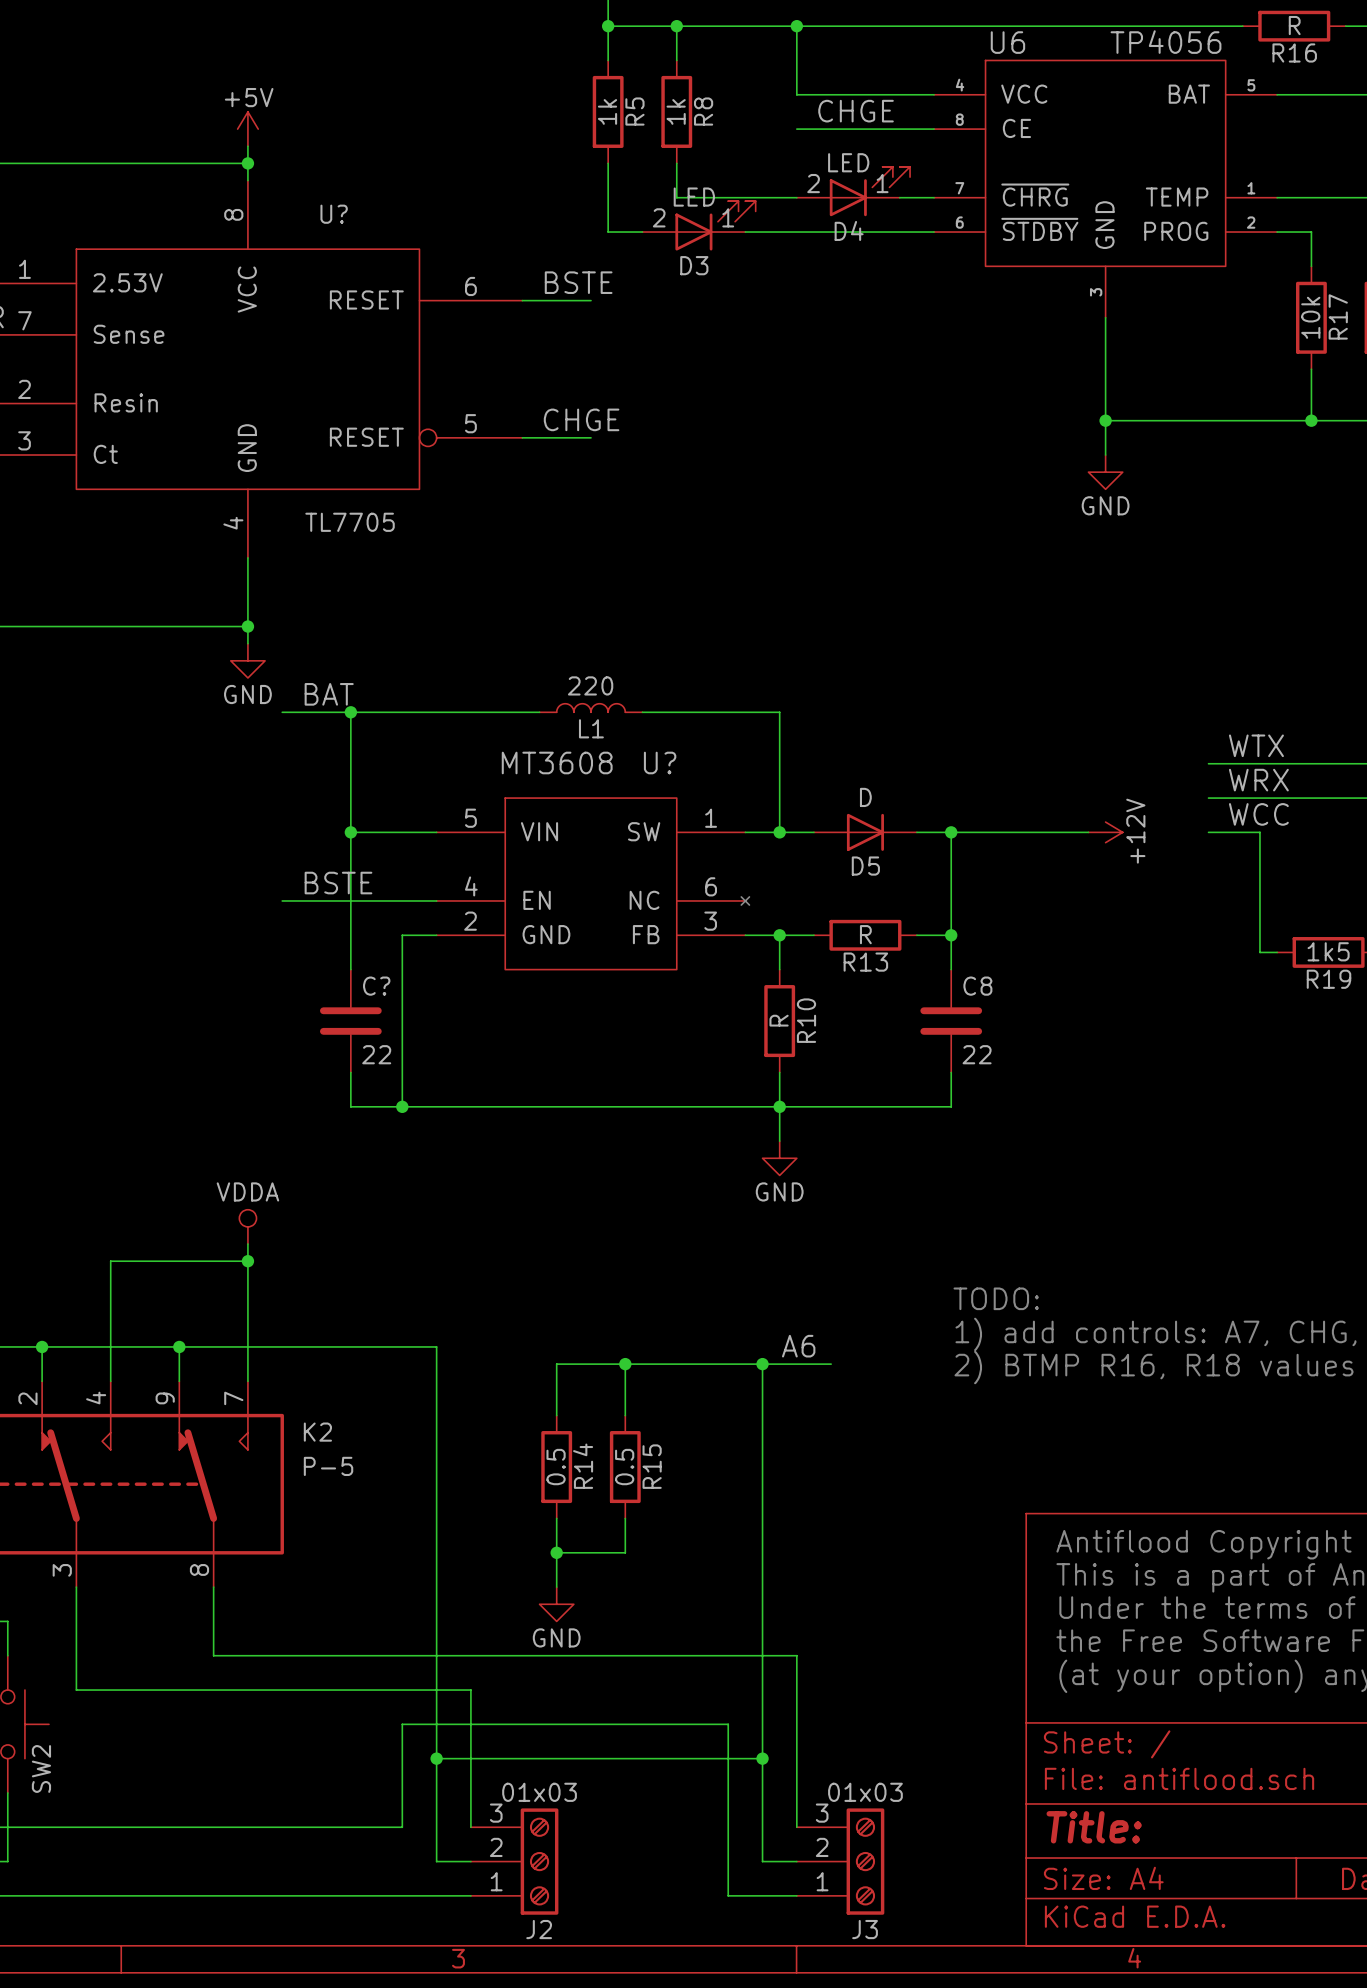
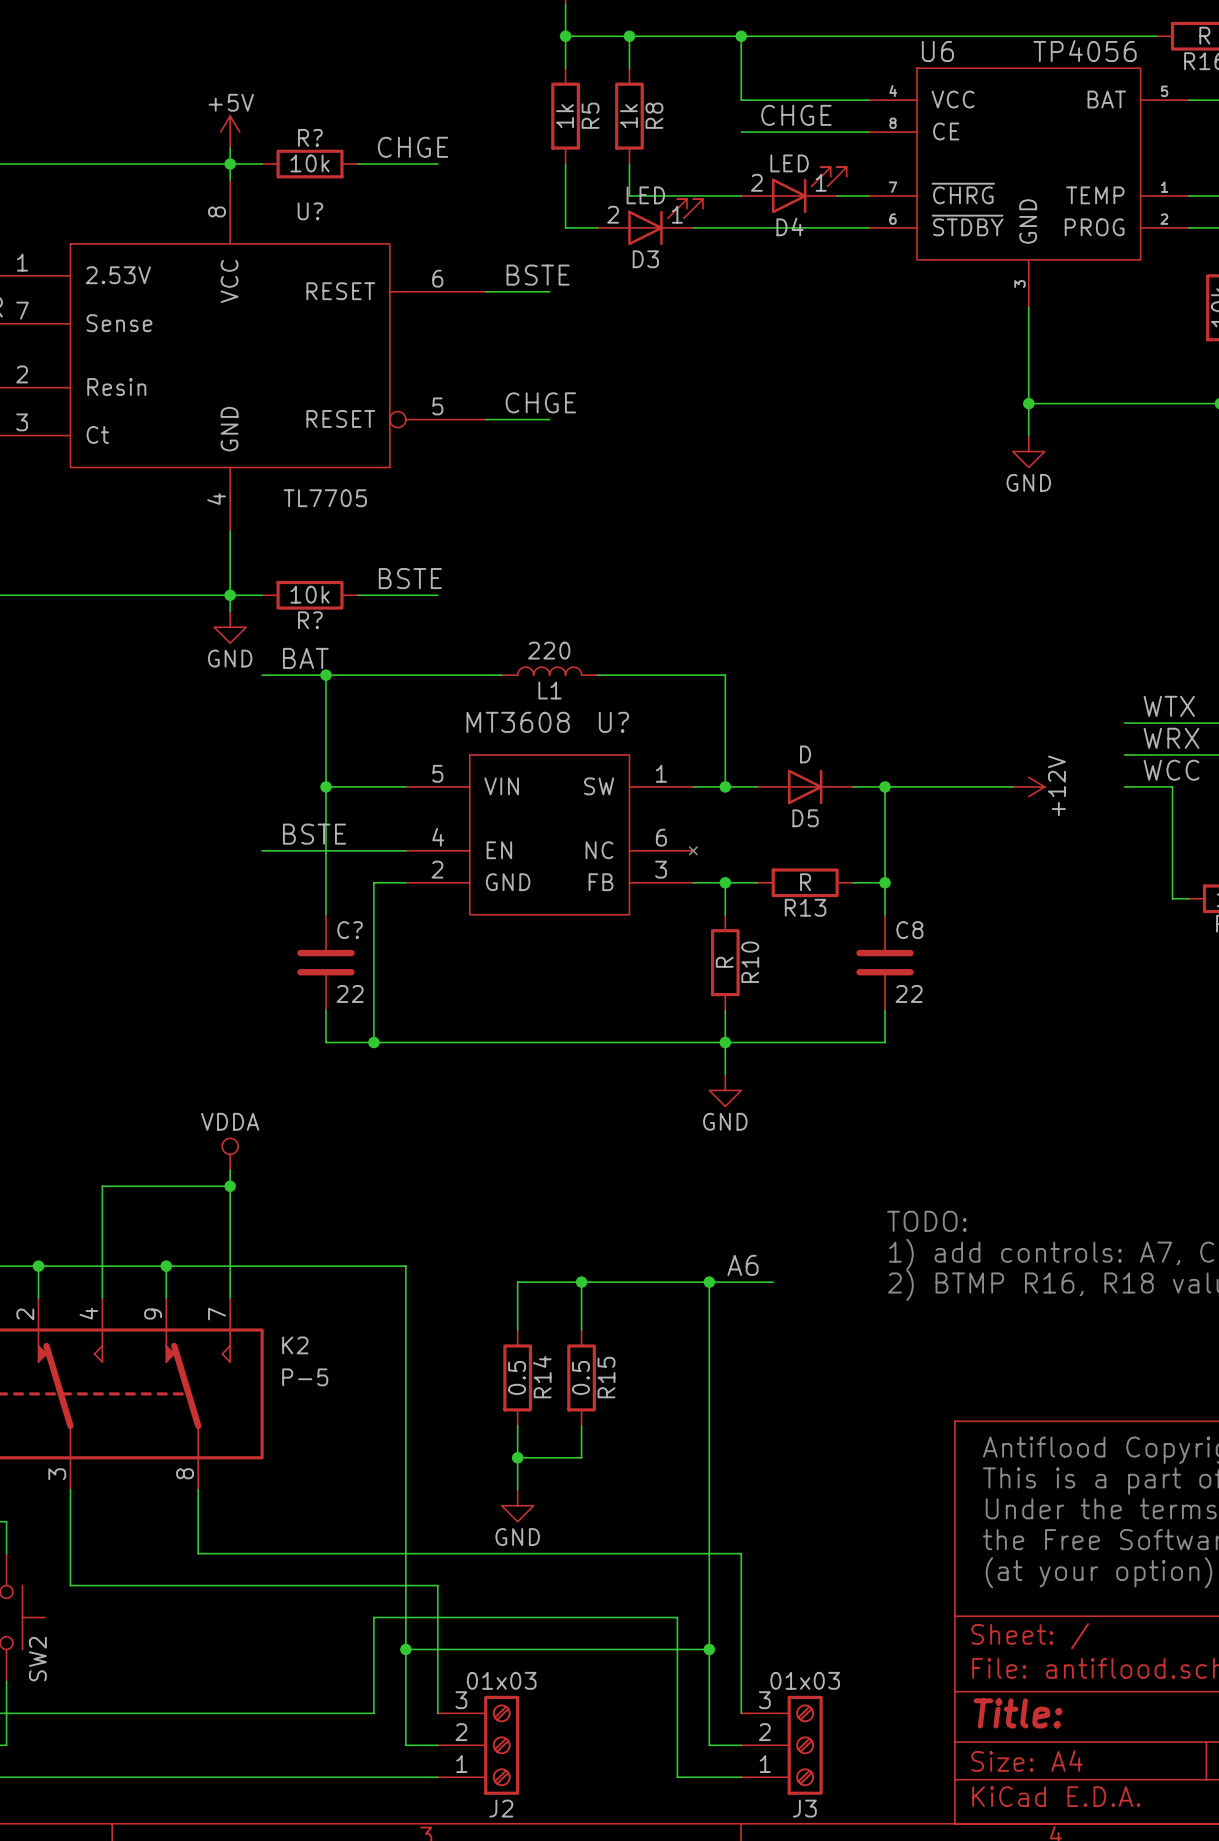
label: none -> CHGE (413, 147)
wire: none -> (230, 164) (262, 164)
R?: none -> 10k (310, 164)
wire: none -> (357, 164) (437, 164)
label: none -> BSTE (410, 578)
wire: none -> (230, 595) (262, 595)
R?: none -> 10k (310, 595)
wire: none -> (357, 595) (437, 595)

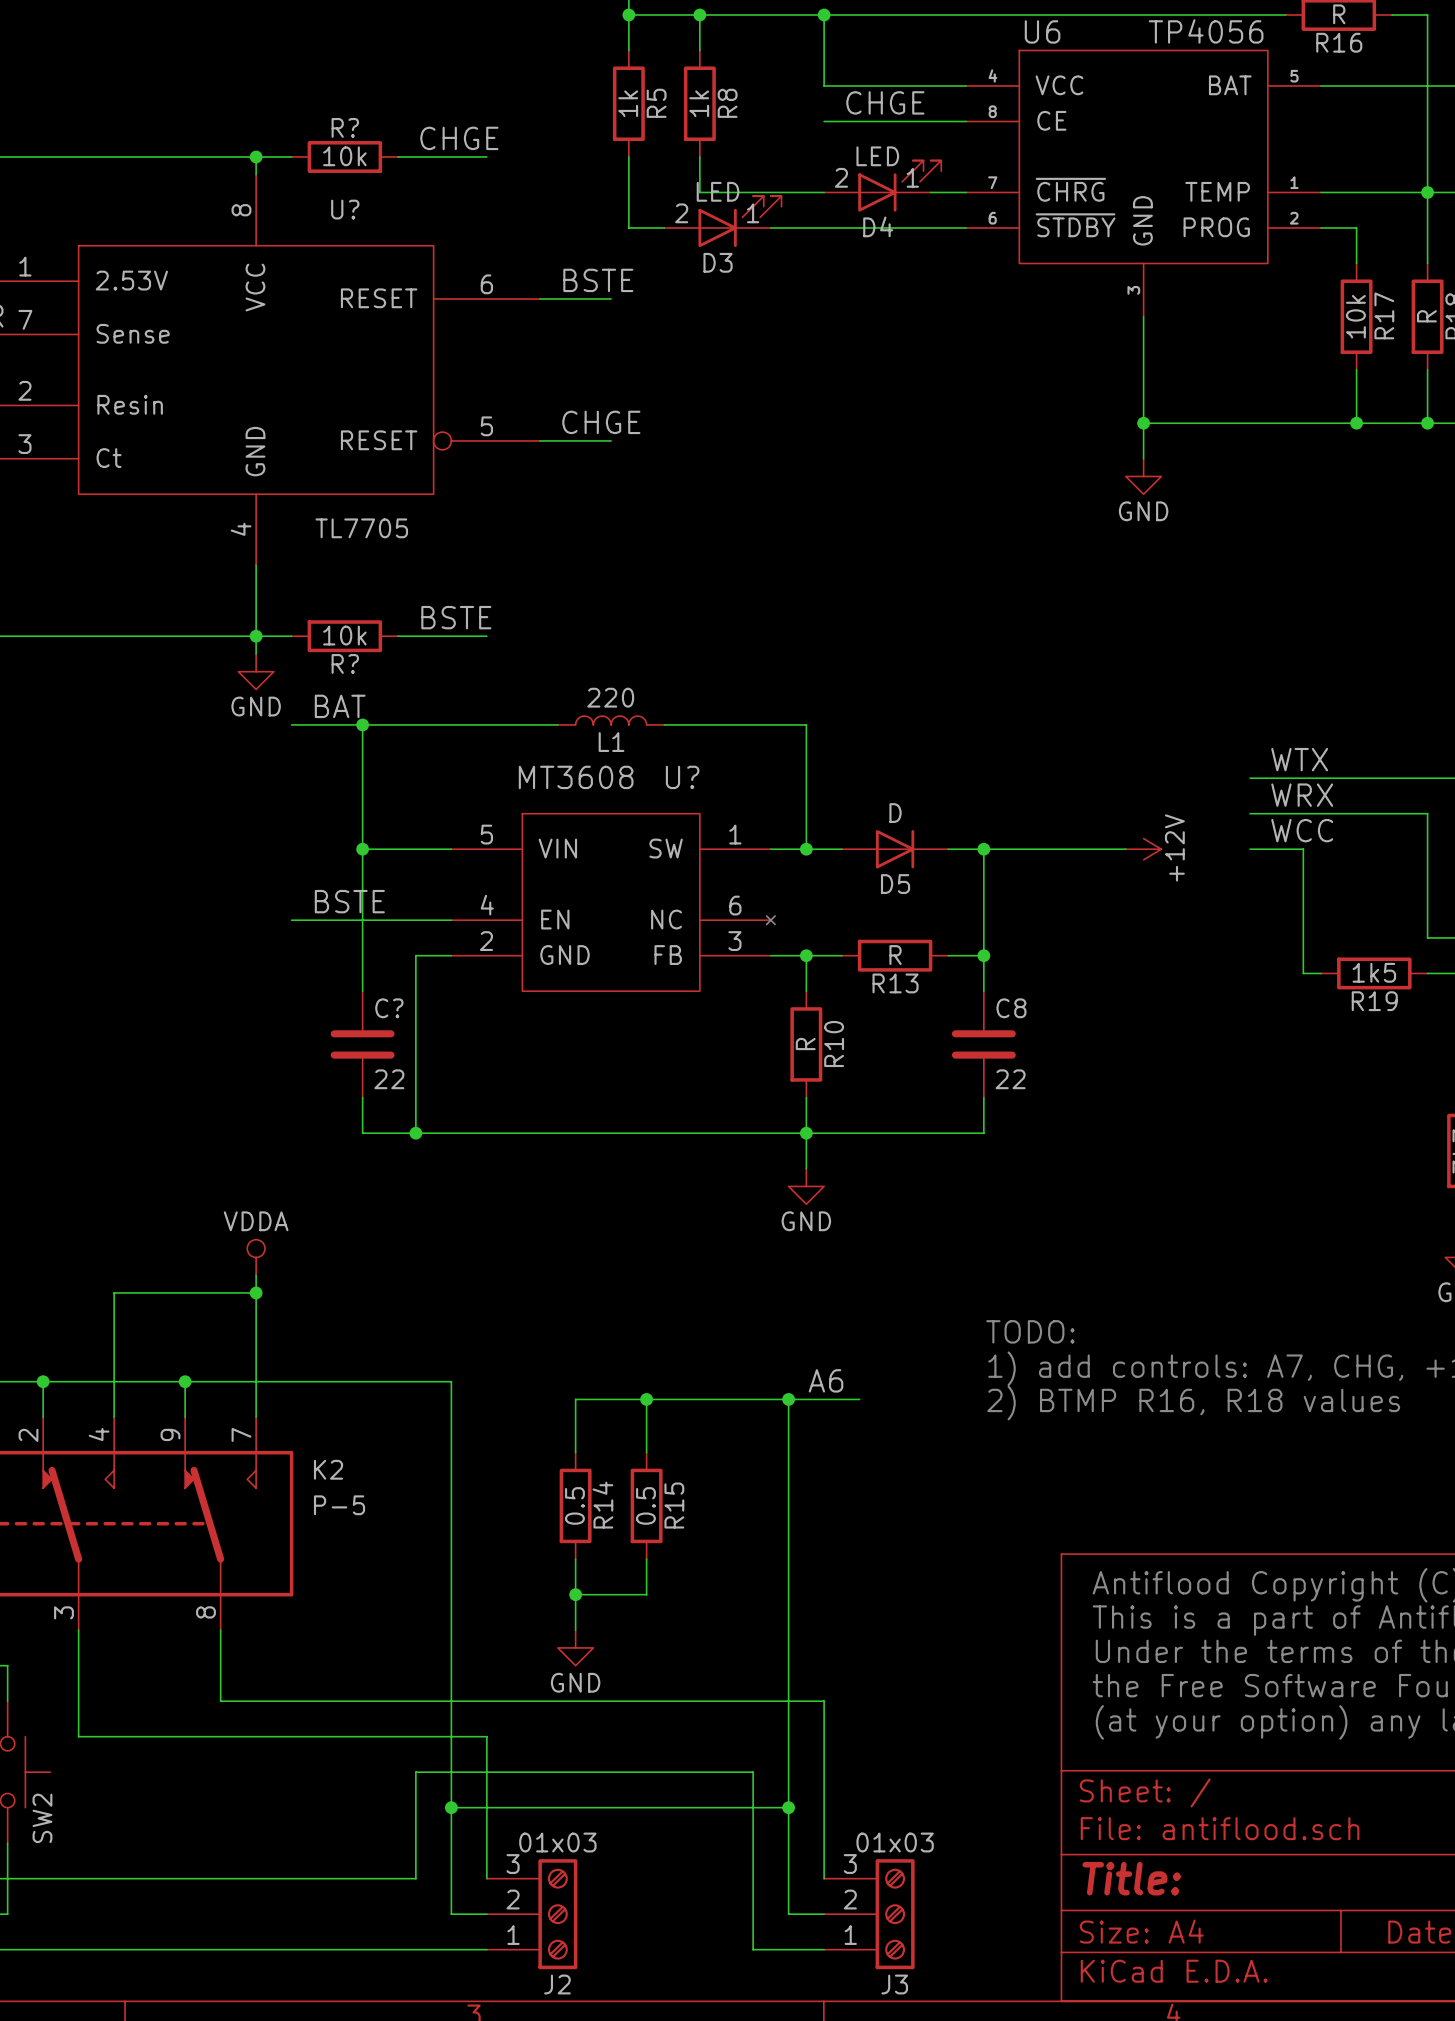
power symbol: +5V (230, 132) -> none
wire: (230, 148) (230, 164) -> none

